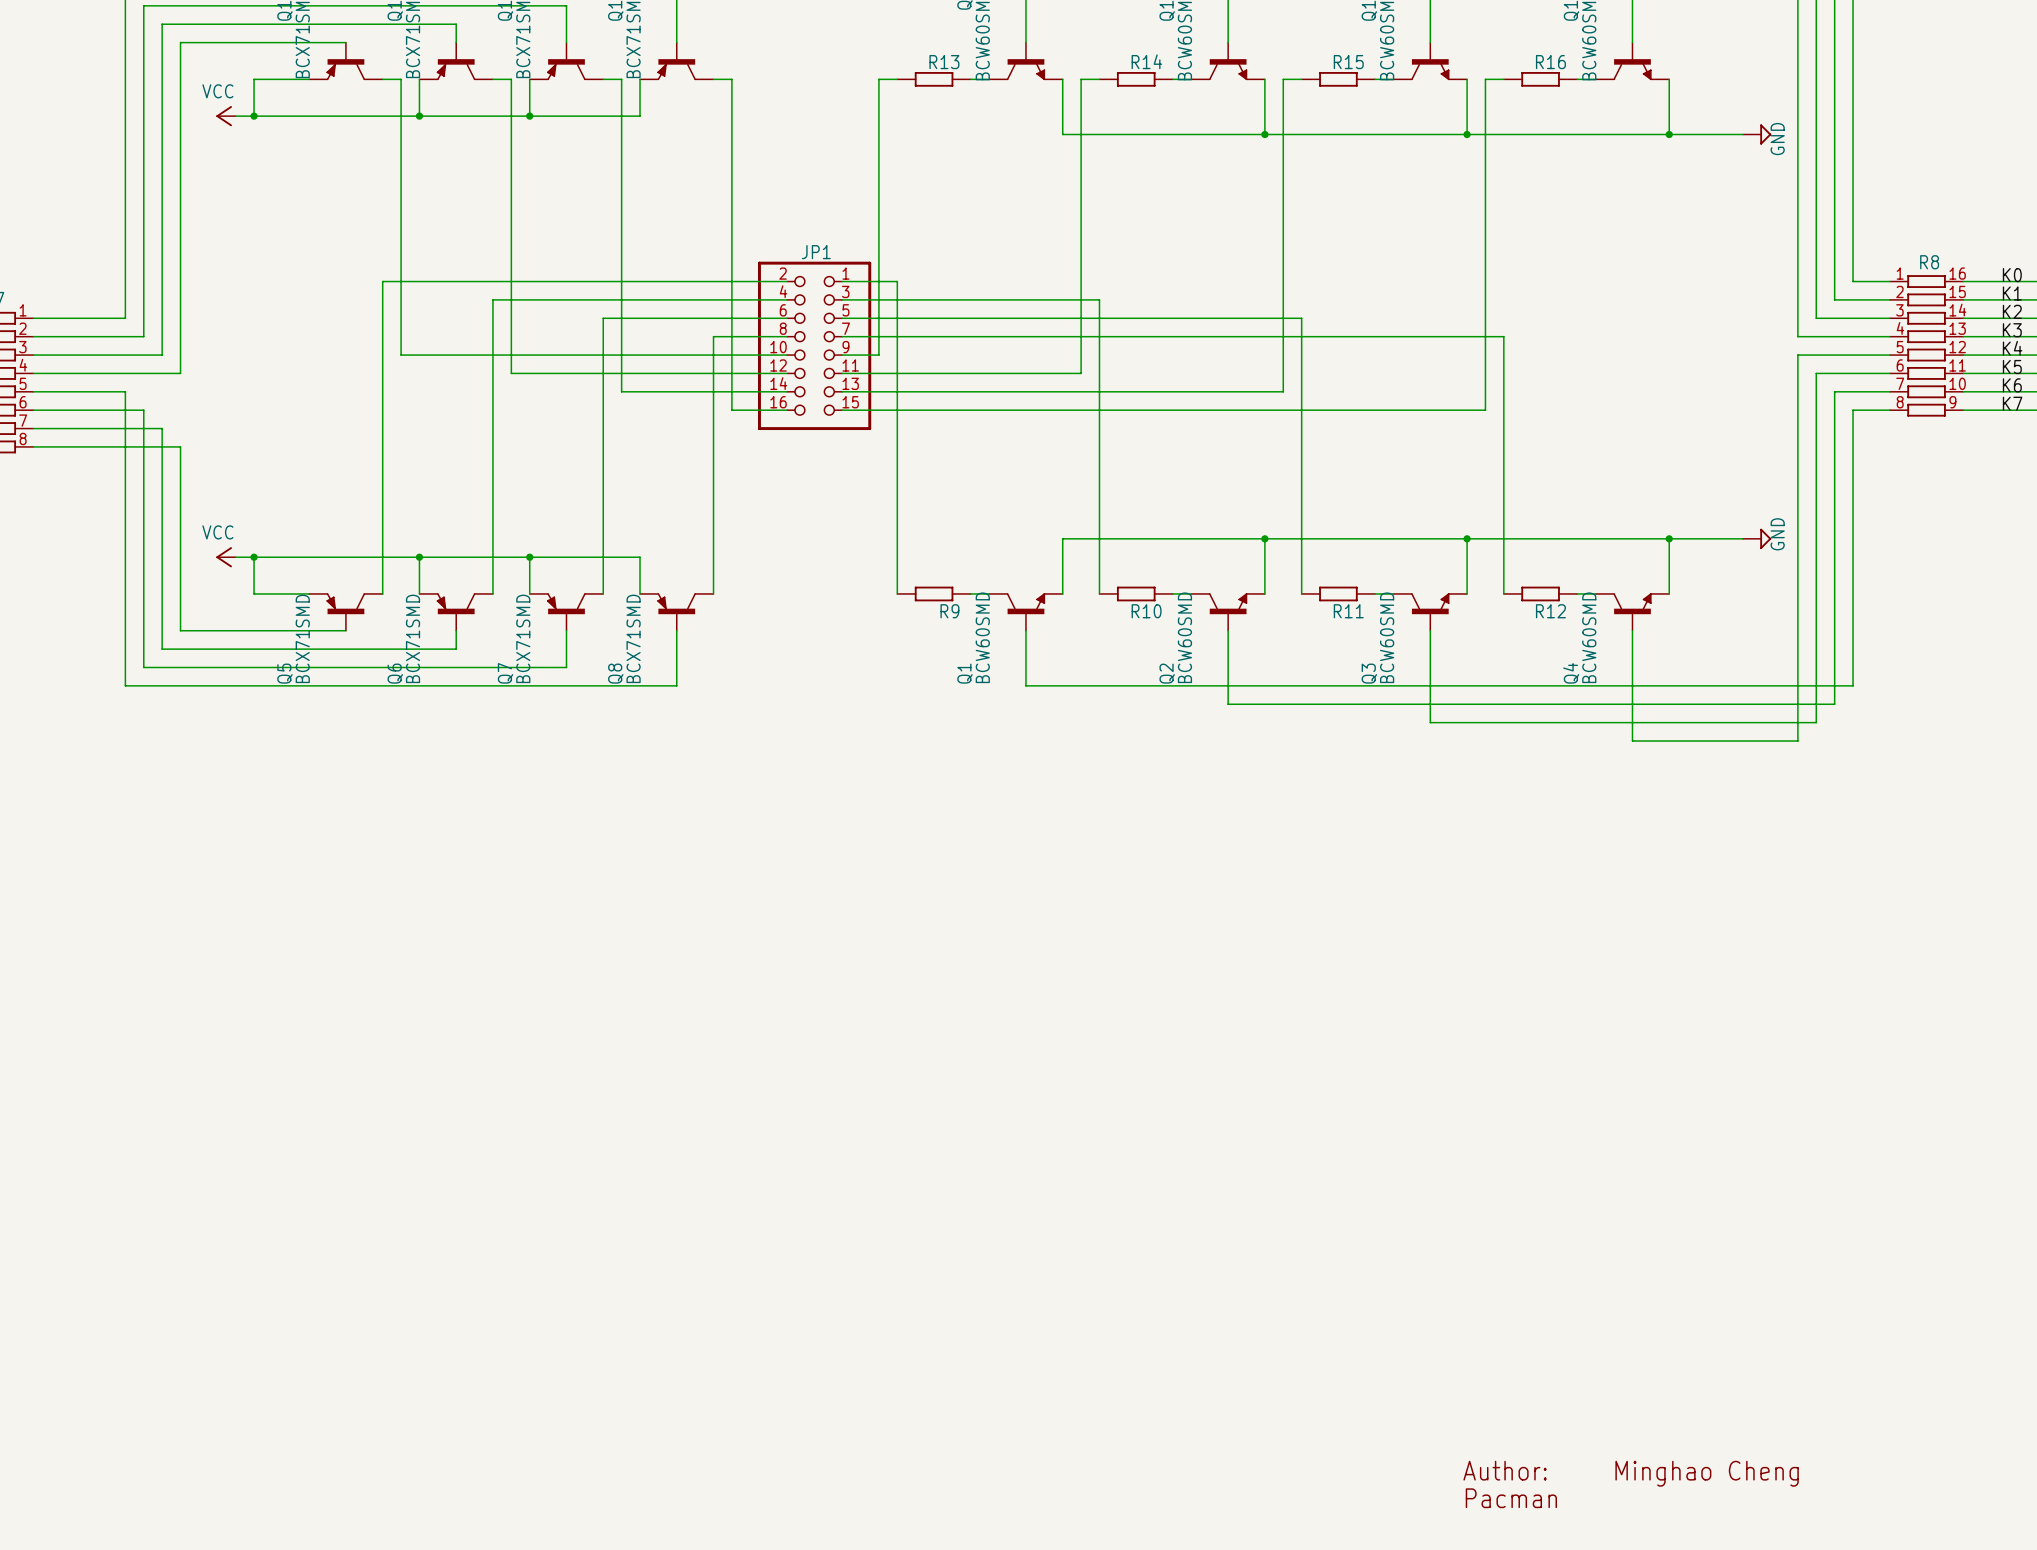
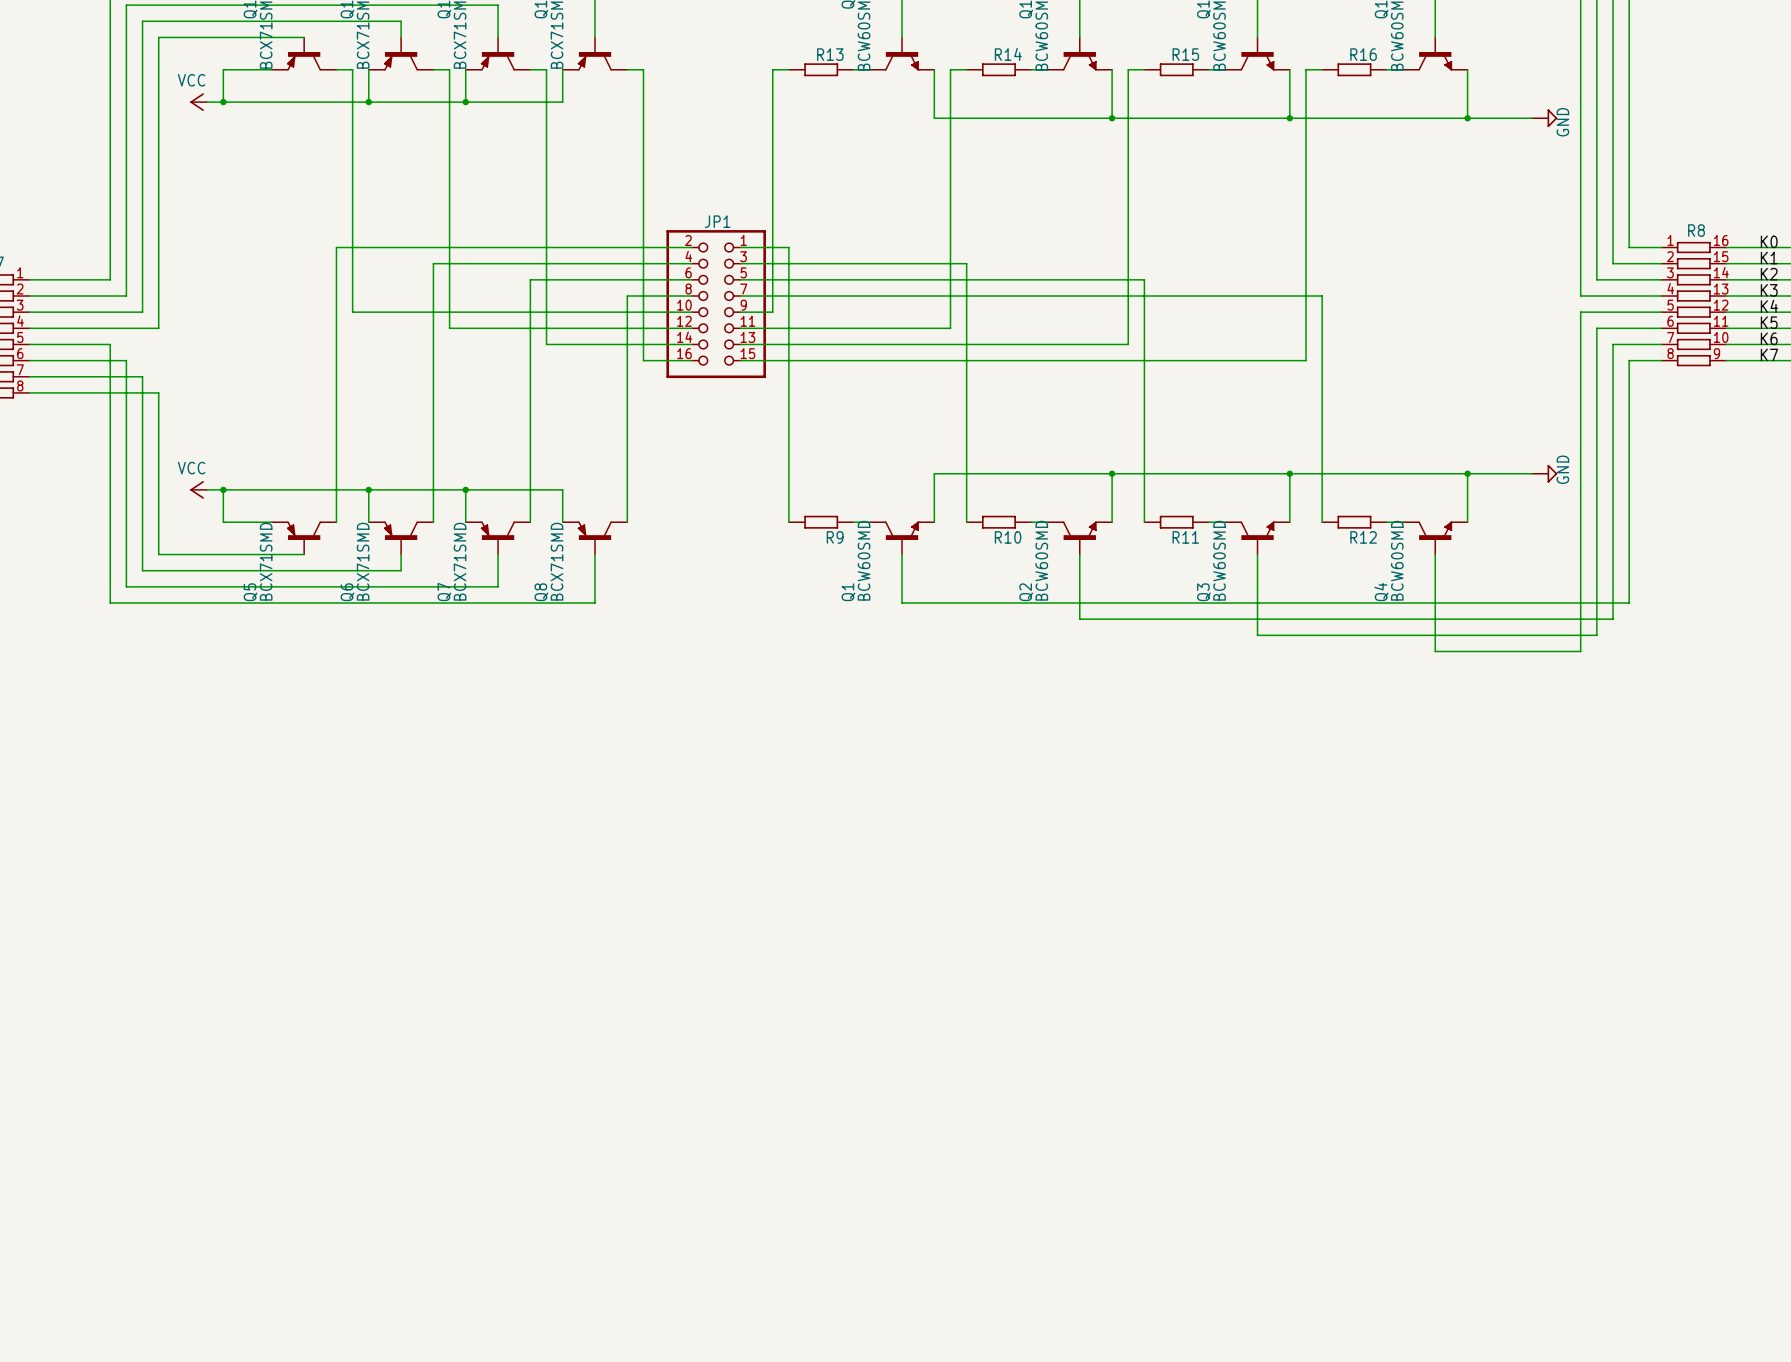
text: Author: Minghao Cheng (1631, 1473) -> none
text: Pacman (1511, 1498) -> none

